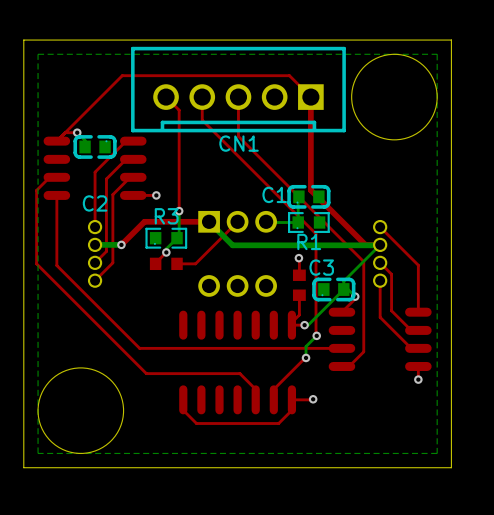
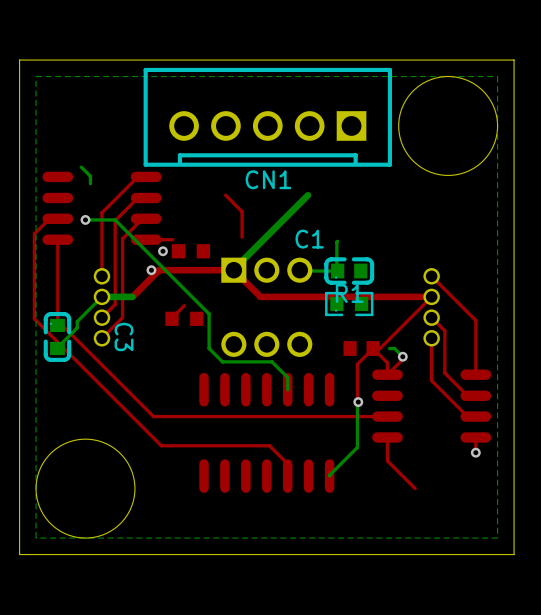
top track: (166, 97) (179, 110) (179, 211) -> none
top track: (202, 97) (202, 120) (316, 233) (316, 303) -> (373, 348) (357, 364)
top track: (238, 97) (238, 136) (363, 261) (363, 351) (349, 366) (341, 366) -> (415, 488) (387, 460) (387, 437)
top track: (77, 132) (65, 132) -> none
via: (77, 132) -> none
top track: (56, 141) (122, 75) (289, 75) (310, 97) (310, 190) (365, 244) -> (233, 270) (260, 296) (414, 296)
C2 side: bottom (95, 146) -> top (361, 348)
top track: none -> (225, 195) (242, 211) (242, 237)
bottom track: none -> (85, 219) (115, 219) (209, 313) (209, 348) (222, 361) (271, 361) (287, 377) (287, 389)
via: none -> (85, 219)
via position: (156, 195) -> (162, 251)
C1 position: (308, 196) -> (349, 271)
bottom track: (179, 211) (179, 236) (166, 248) (166, 252) -> none
via: (179, 211) -> none
via: none -> (151, 270)
bottom track: (209, 221) (232, 245) (380, 244) (343, 281) (343, 289) (308, 325) (304, 325) -> (233, 270) (308, 195)
top track: (237, 221) (195, 263) (177, 263) -> none
R1 position: (308, 222) -> (349, 303)
R3 side: bottom (166, 238) -> top (190, 251)
bottom track: none -> (101, 296) (77, 321) (77, 327) (57, 348)
via: (121, 244) -> none
top track: none -> (431, 296) (380, 348) (373, 348)
via: (166, 252) -> none
top track: (298, 258) (299, 275) -> none
via: (298, 258) -> none
C3 name position: C3 (321, 267) -> C3 (124, 336)
part: (299, 285) -> none
top track: none -> (373, 348) (387, 362) (387, 374)
C3 rotation: 0° (333, 289) -> 90° clockwise (57, 336)
C3 position: (333, 289) -> (57, 336)
top track: (299, 295) (299, 314) (291, 322) (291, 325) (304, 325) -> none
via: (304, 325) -> none
bottom track: (316, 335) (306, 346) (306, 357) -> none
bottom track: none -> (357, 406) (357, 447) (329, 476)
top track: (306, 357) (273, 389) (273, 399) -> none
via: (306, 357) -> none
top track: (313, 399) (291, 399) (291, 410) (278, 423) (196, 423) (183, 410) (183, 399) -> none
via: (313, 399) -> none

